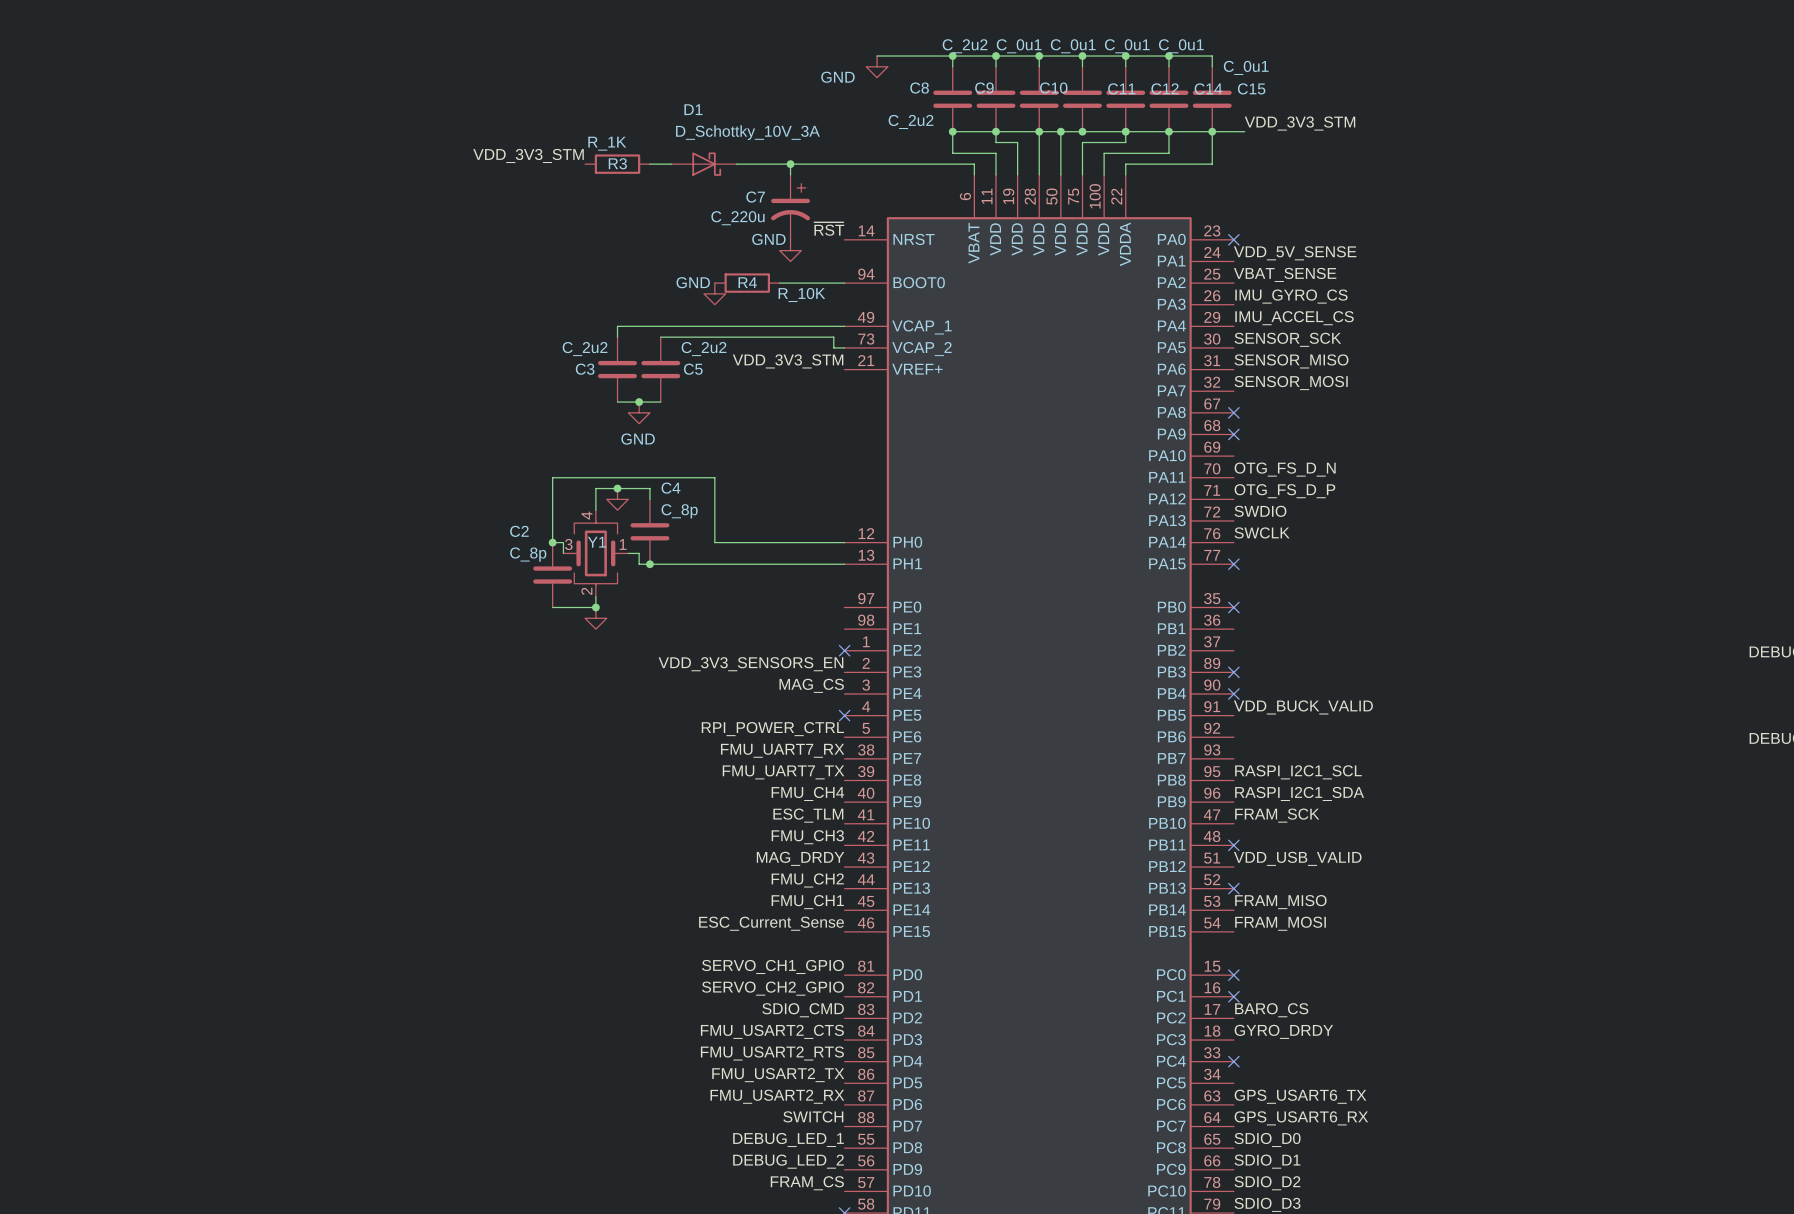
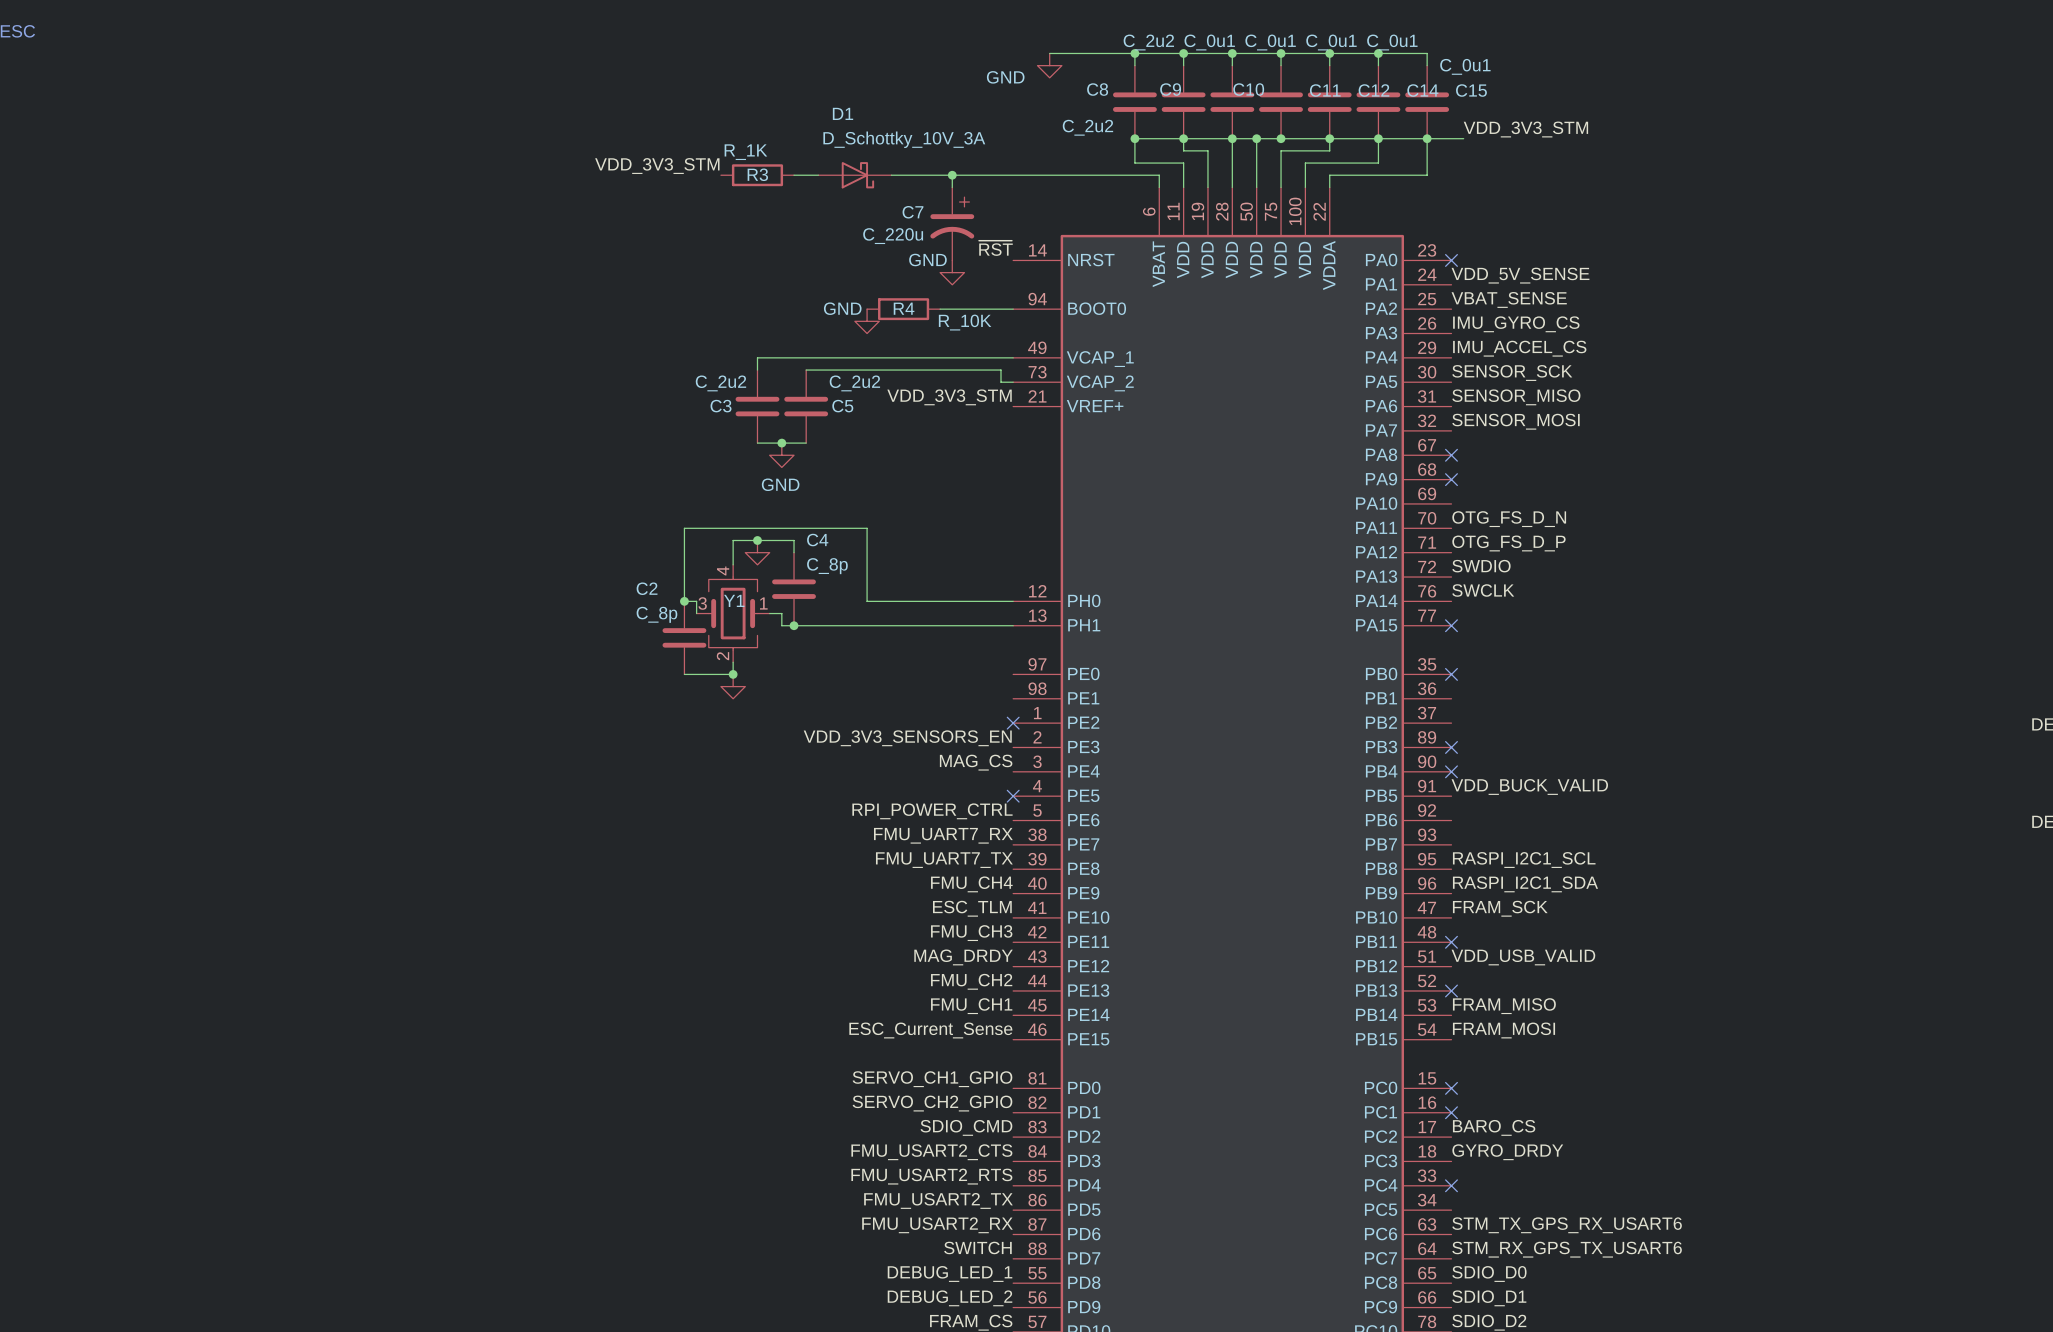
label: GPS_USART6_TX (1300, 1096) -> STM_TX_GPS_RX_USART6 (1567, 1225)
label: GPS_USART6_RX (1301, 1118) -> STM_RX_GPS_TX_USART6 (1567, 1249)

